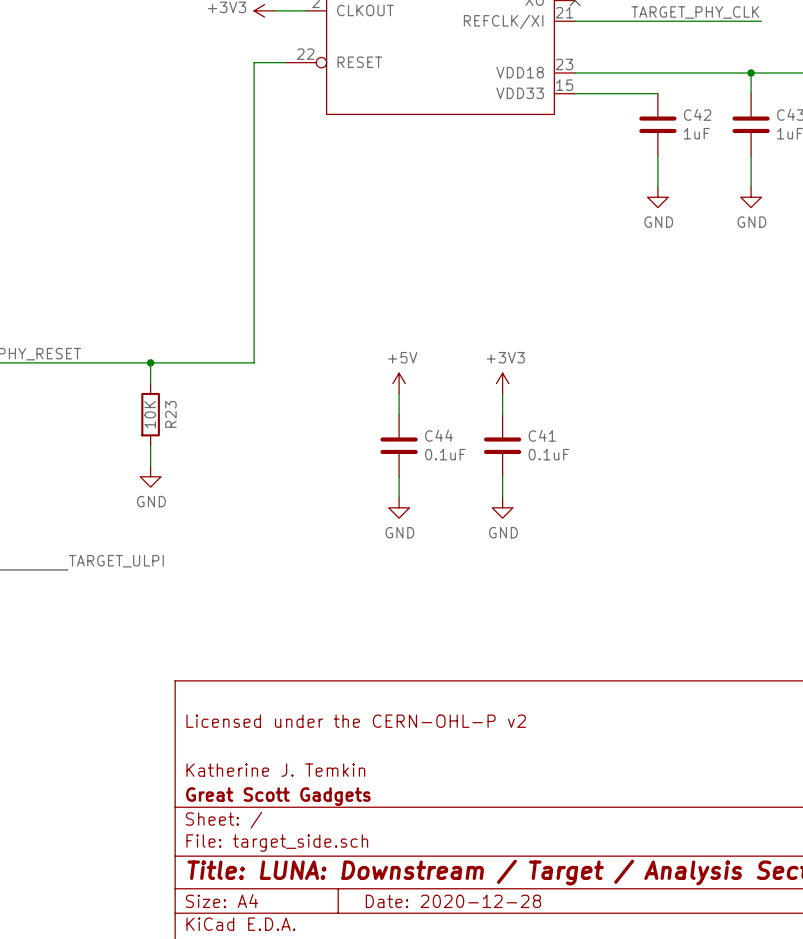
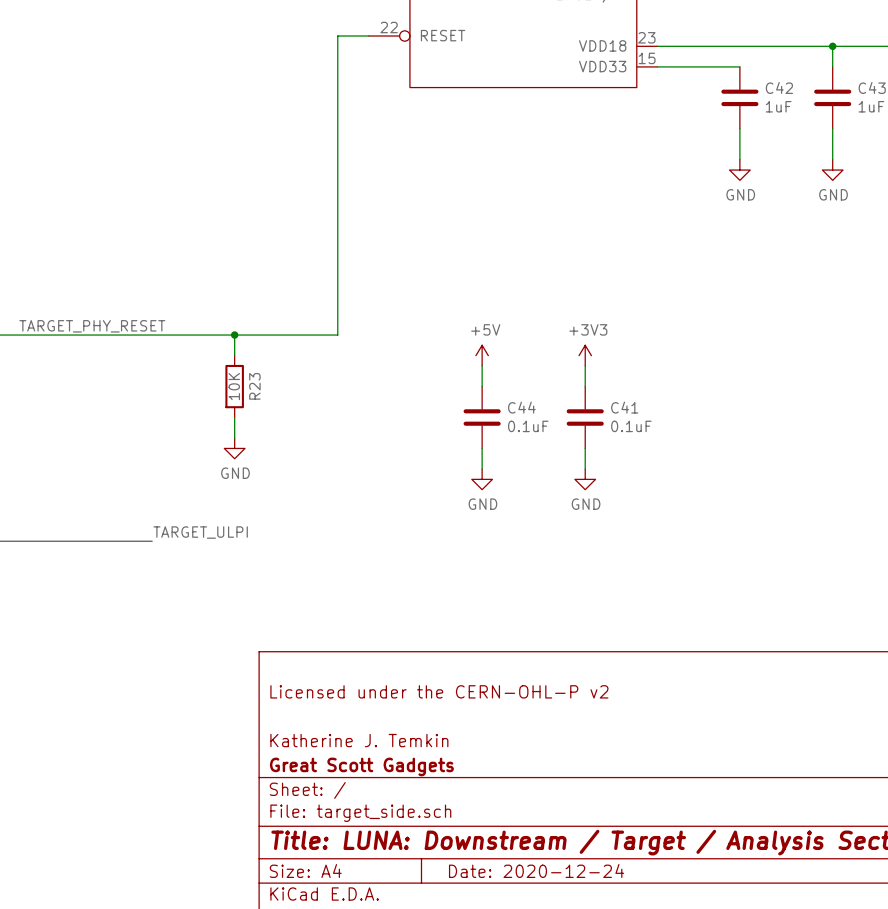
title block: Date: 2020-12-28 (453, 901) -> Date: 2020-12-24 (536, 870)

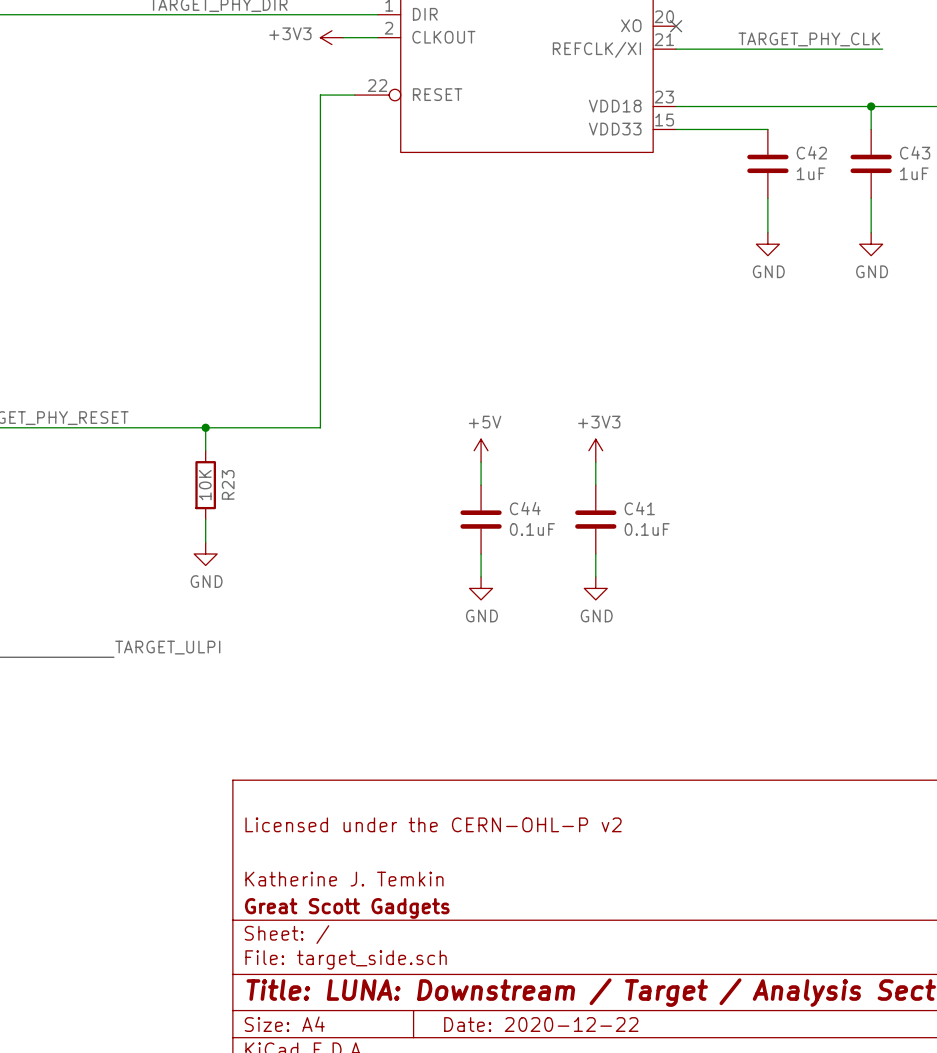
title block: Date: 2020-12-24 (536, 870) -> Date: 2020-12-22 (541, 1024)

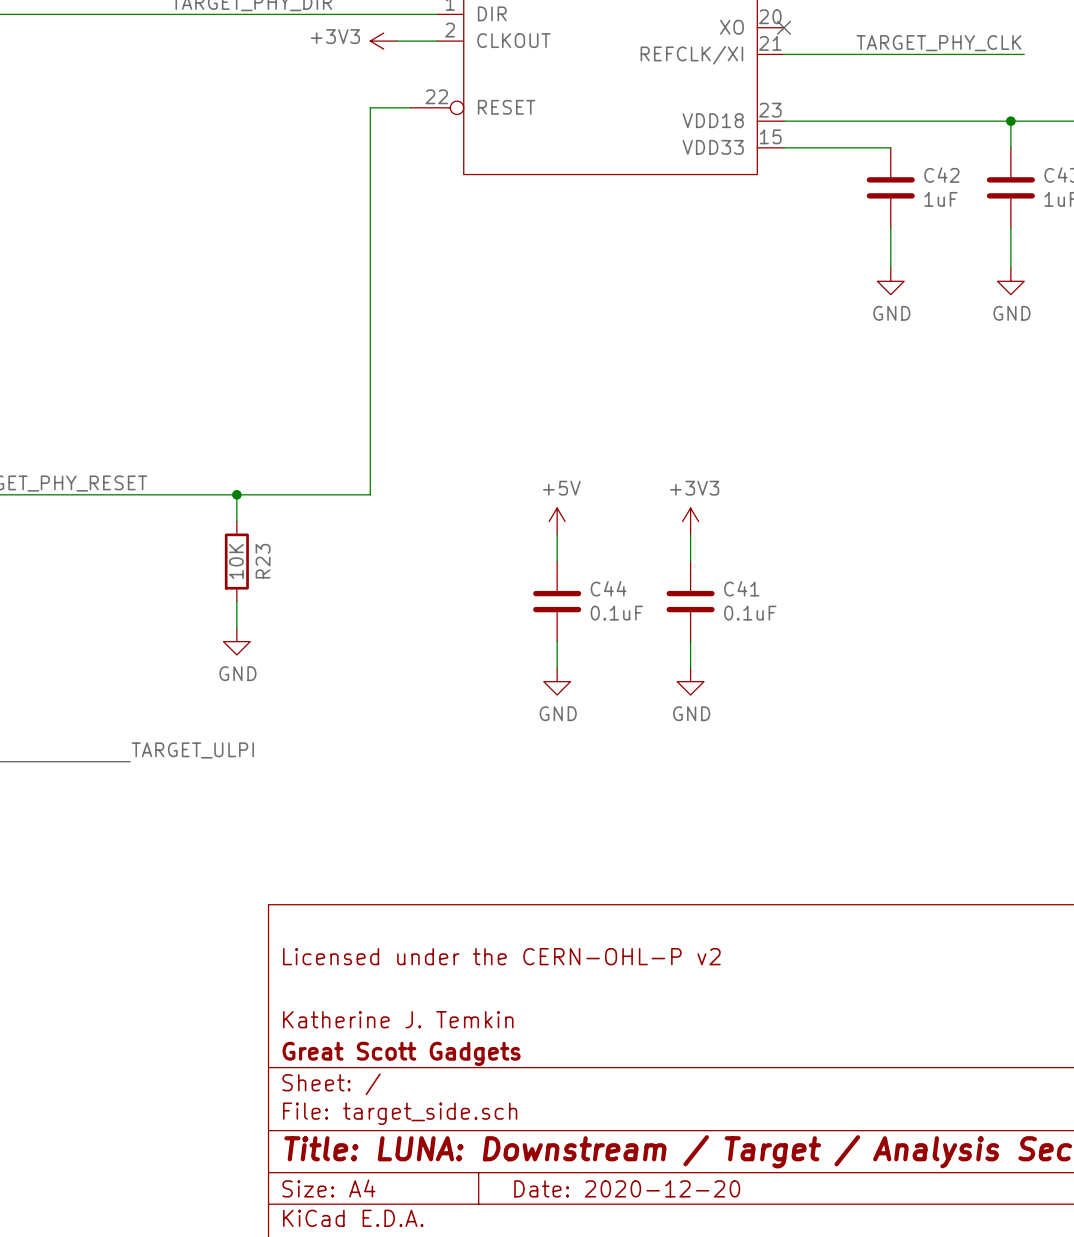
title block: Date: 2020-12-22 (541, 1024) -> Date: 2020-12-20 (627, 1188)

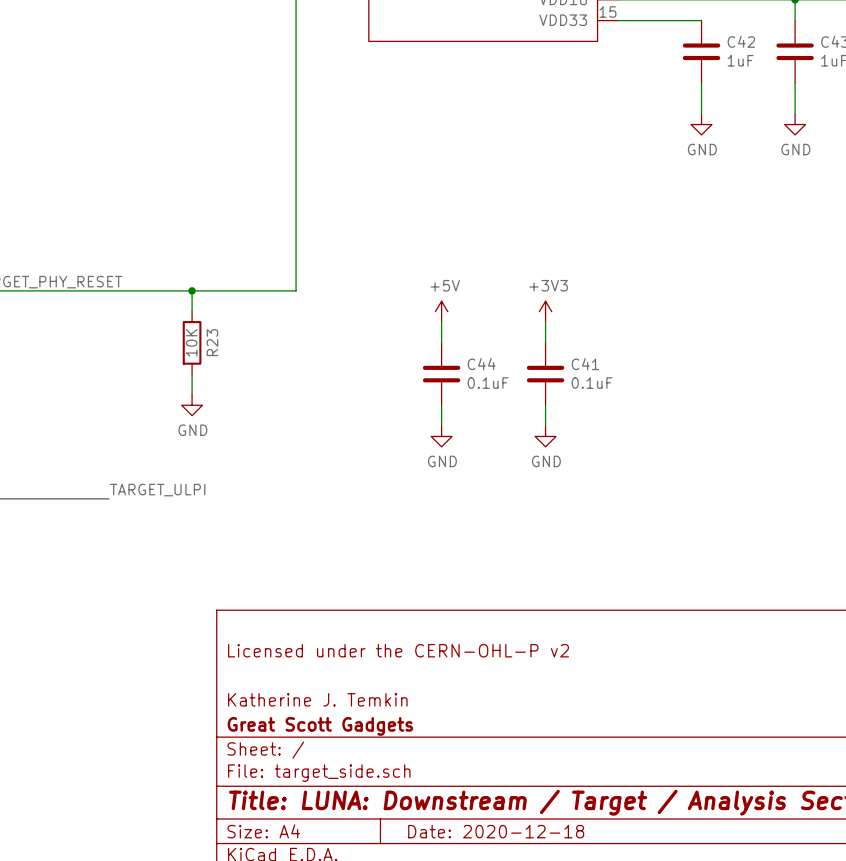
title block: Date: 2020-12-20 (627, 1188) -> Date: 2020-12-18 (496, 831)

